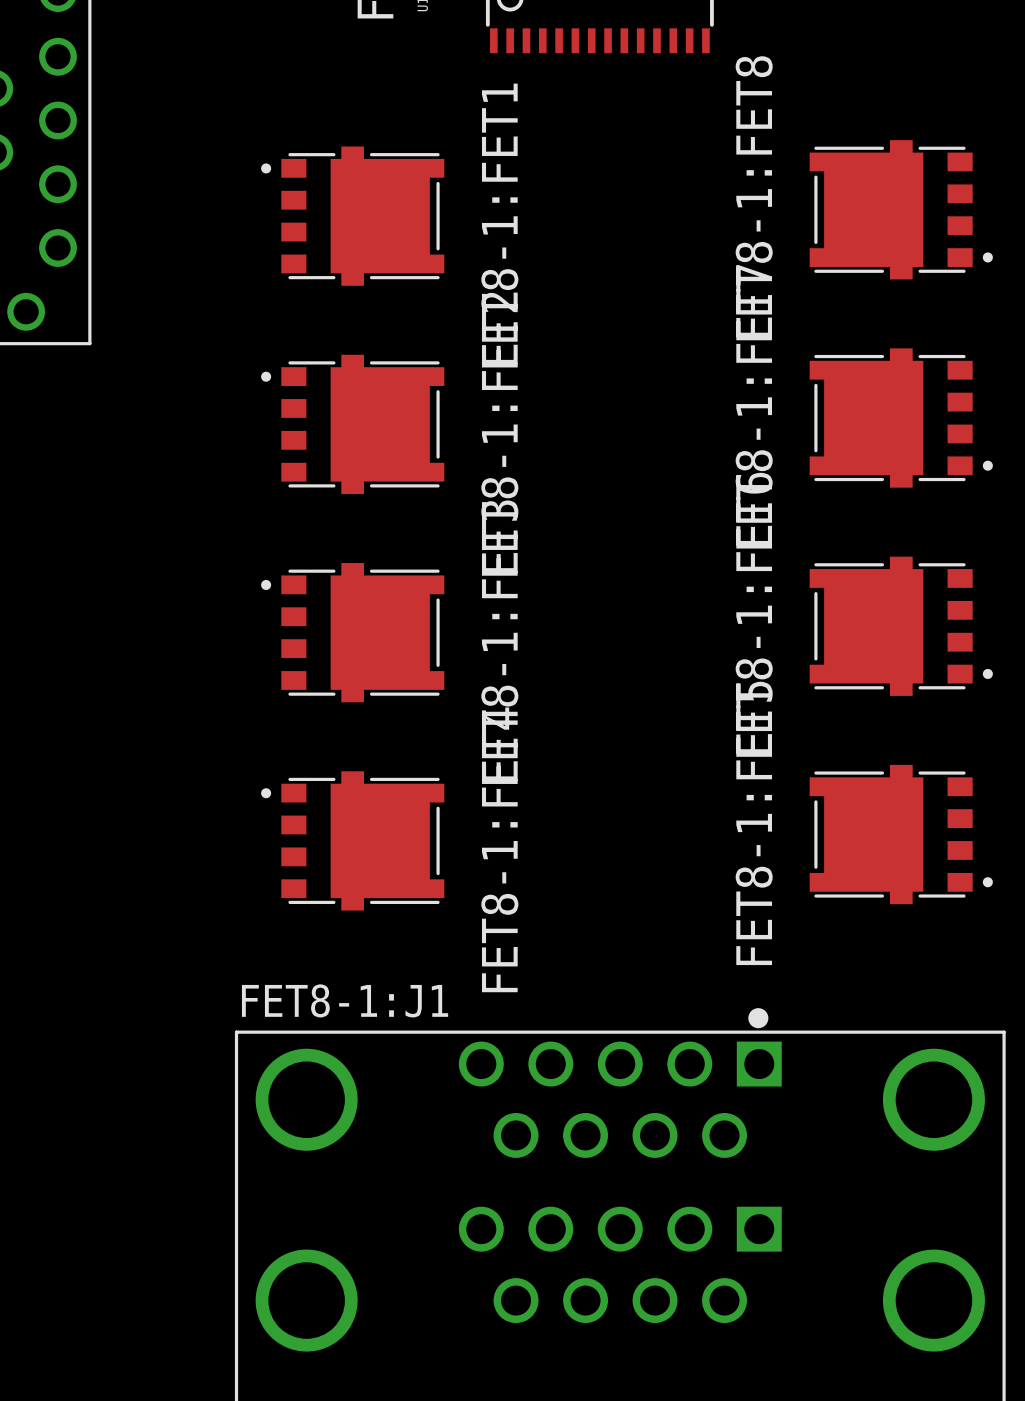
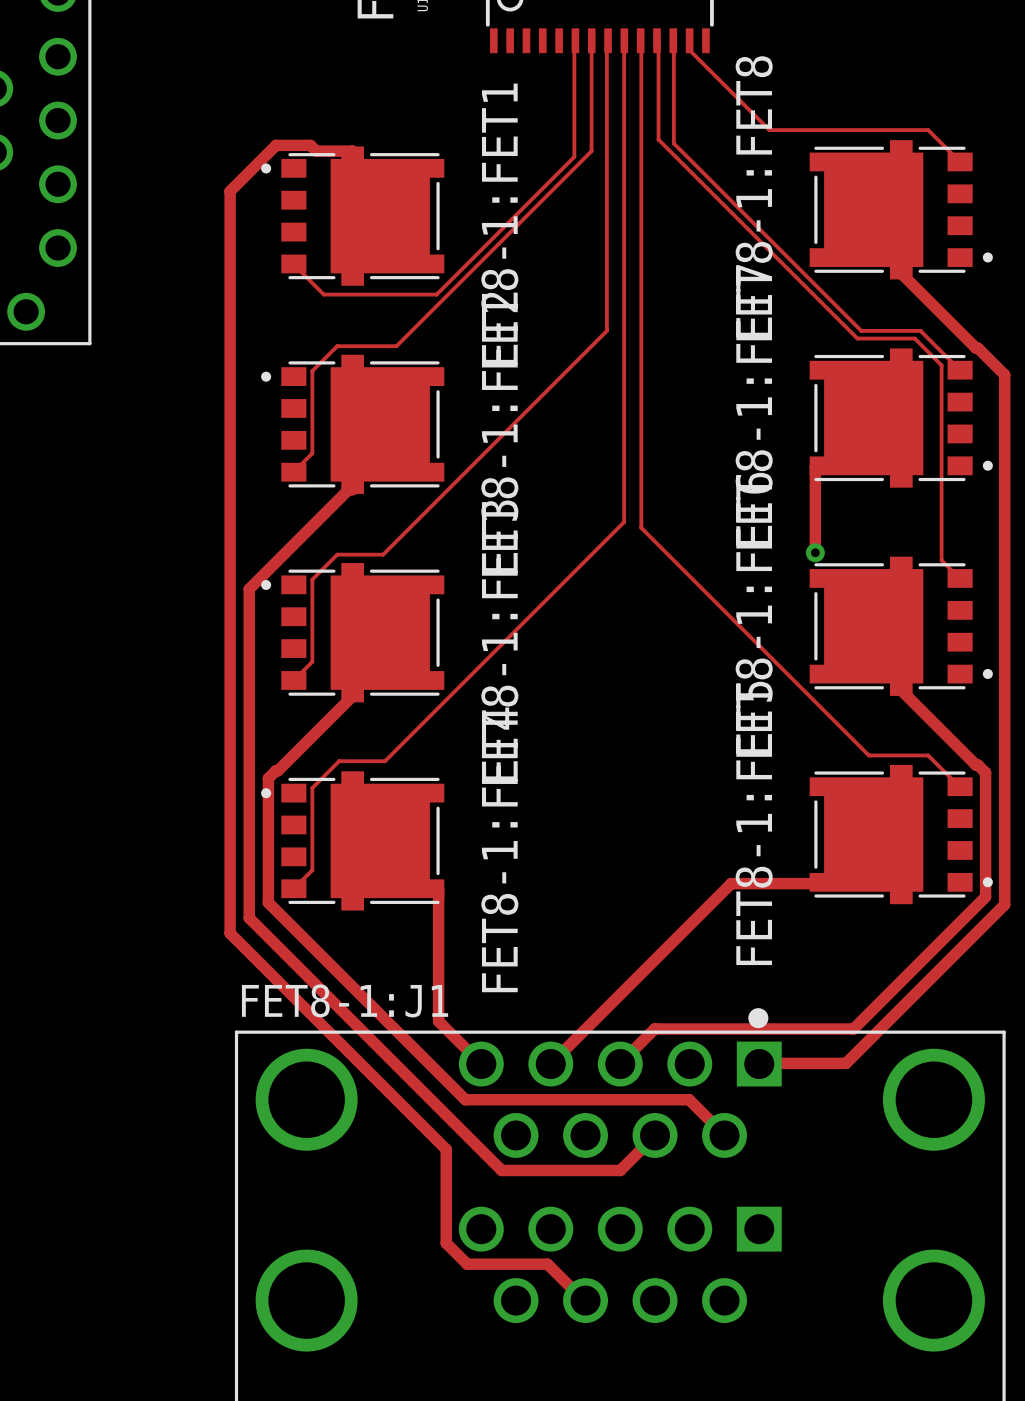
track: none -> (575, 40) (574, 156) (436, 294) (323, 294) (293, 263)
track: none -> (591, 40) (591, 151) (396, 346) (337, 346) (312, 371) (312, 453) (293, 472)
track: none -> (608, 40) (606, 330) (383, 554) (337, 554) (312, 579) (312, 661) (293, 680)
track: none -> (624, 40) (624, 522) (385, 761) (339, 761) (312, 788) (312, 870) (293, 888)
track: none -> (640, 40) (641, 527) (868, 755) (928, 755) (960, 786)
track: none -> (656, 40) (658, 42) (658, 139) (857, 338) (914, 338) (941, 365) (941, 560) (960, 578)
track: none -> (673, 40) (673, 143) (861, 330) (920, 330) (960, 370)
track: none -> (689, 40) (691, 51) (769, 130) (928, 130) (960, 161)
track: none -> (352, 152) (352, 151) (316, 151) (310, 145) (276, 145) (230, 191) (230, 933) (446, 1149) (446, 1243) (467, 1264) (547, 1264) (585, 1300)
track: none -> (901, 273) (1004, 374) (1004, 904) (845, 1063) (759, 1064)
track: none -> (816, 465) (815, 552)
track: none -> (352, 487) (249, 589) (249, 918) (501, 1170) (620, 1170) (655, 1135)
via: none -> (815, 552)
track: none -> (901, 689) (985, 772) (985, 897) (853, 1028) (654, 1028) (620, 1064)
track: none -> (352, 696) (268, 778) (268, 902) (465, 1099) (689, 1099) (724, 1135)
track: none -> (816, 882) (731, 883) (550, 1064)
track: none -> (437, 888) (438, 1021) (481, 1064)

